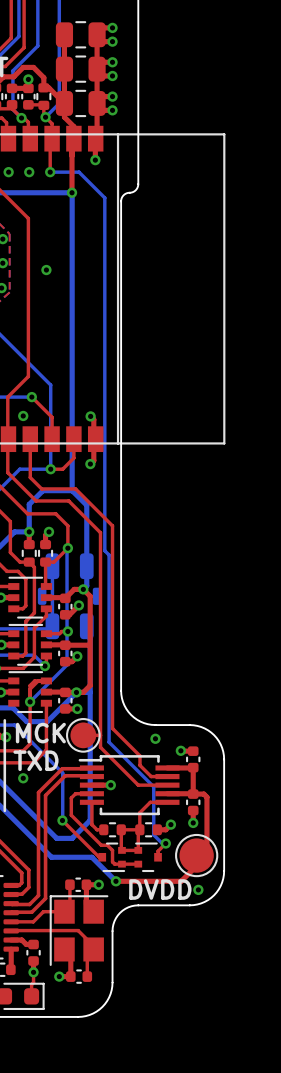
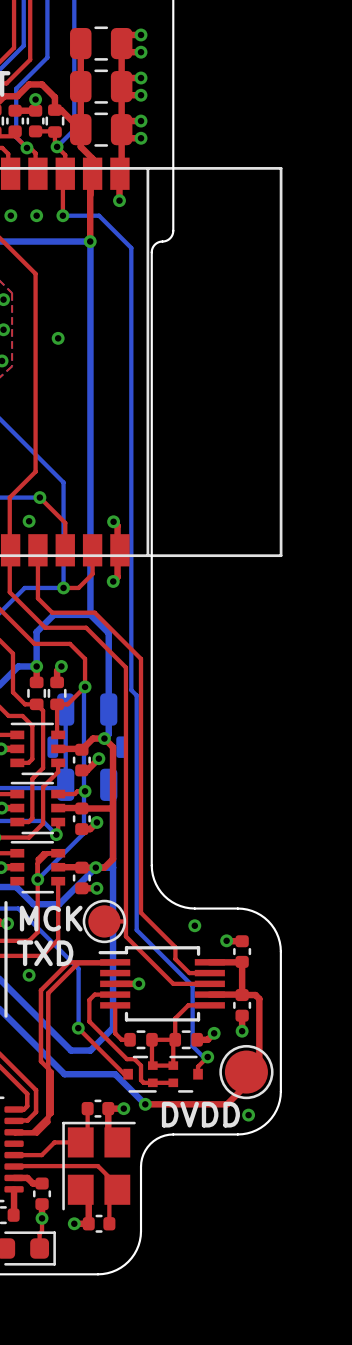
top track: none -> (115, 962) (68, 962) (40, 990) (40, 1061) (51, 1072) (51, 1113) (32, 1132) (14, 1132)
top track: (91, 775) (65, 775) (45, 795) (45, 898) (31, 912) (11, 912) -> none

